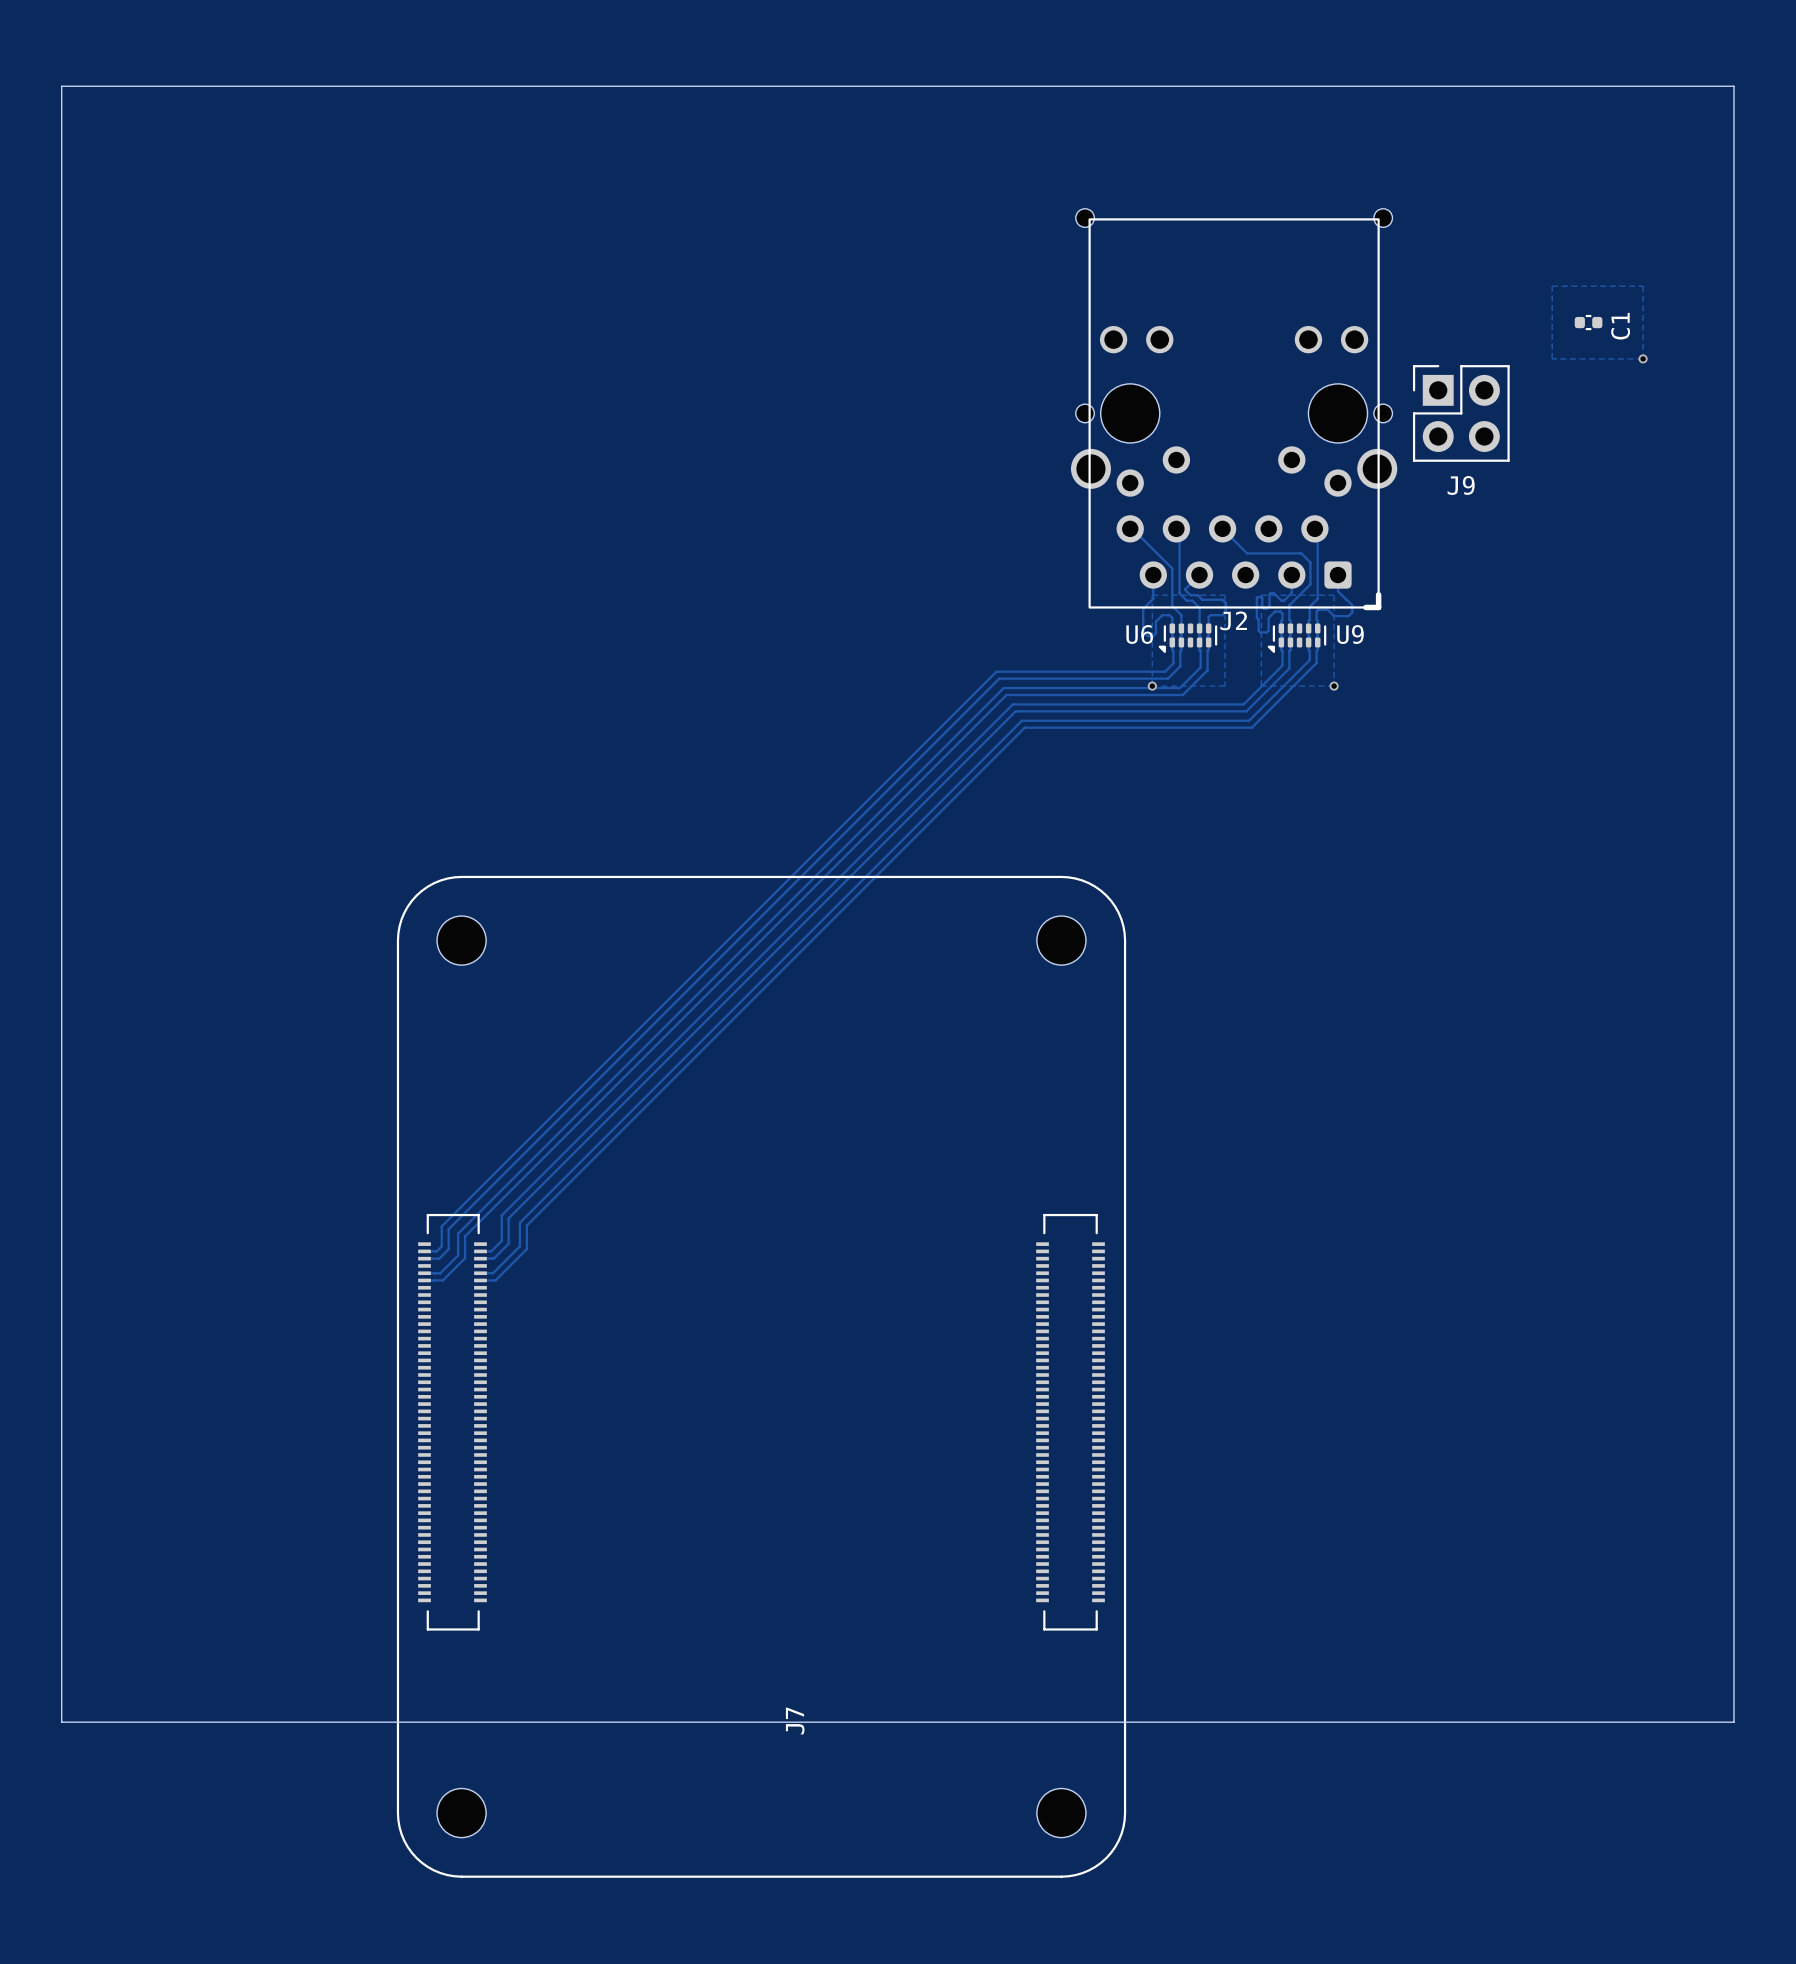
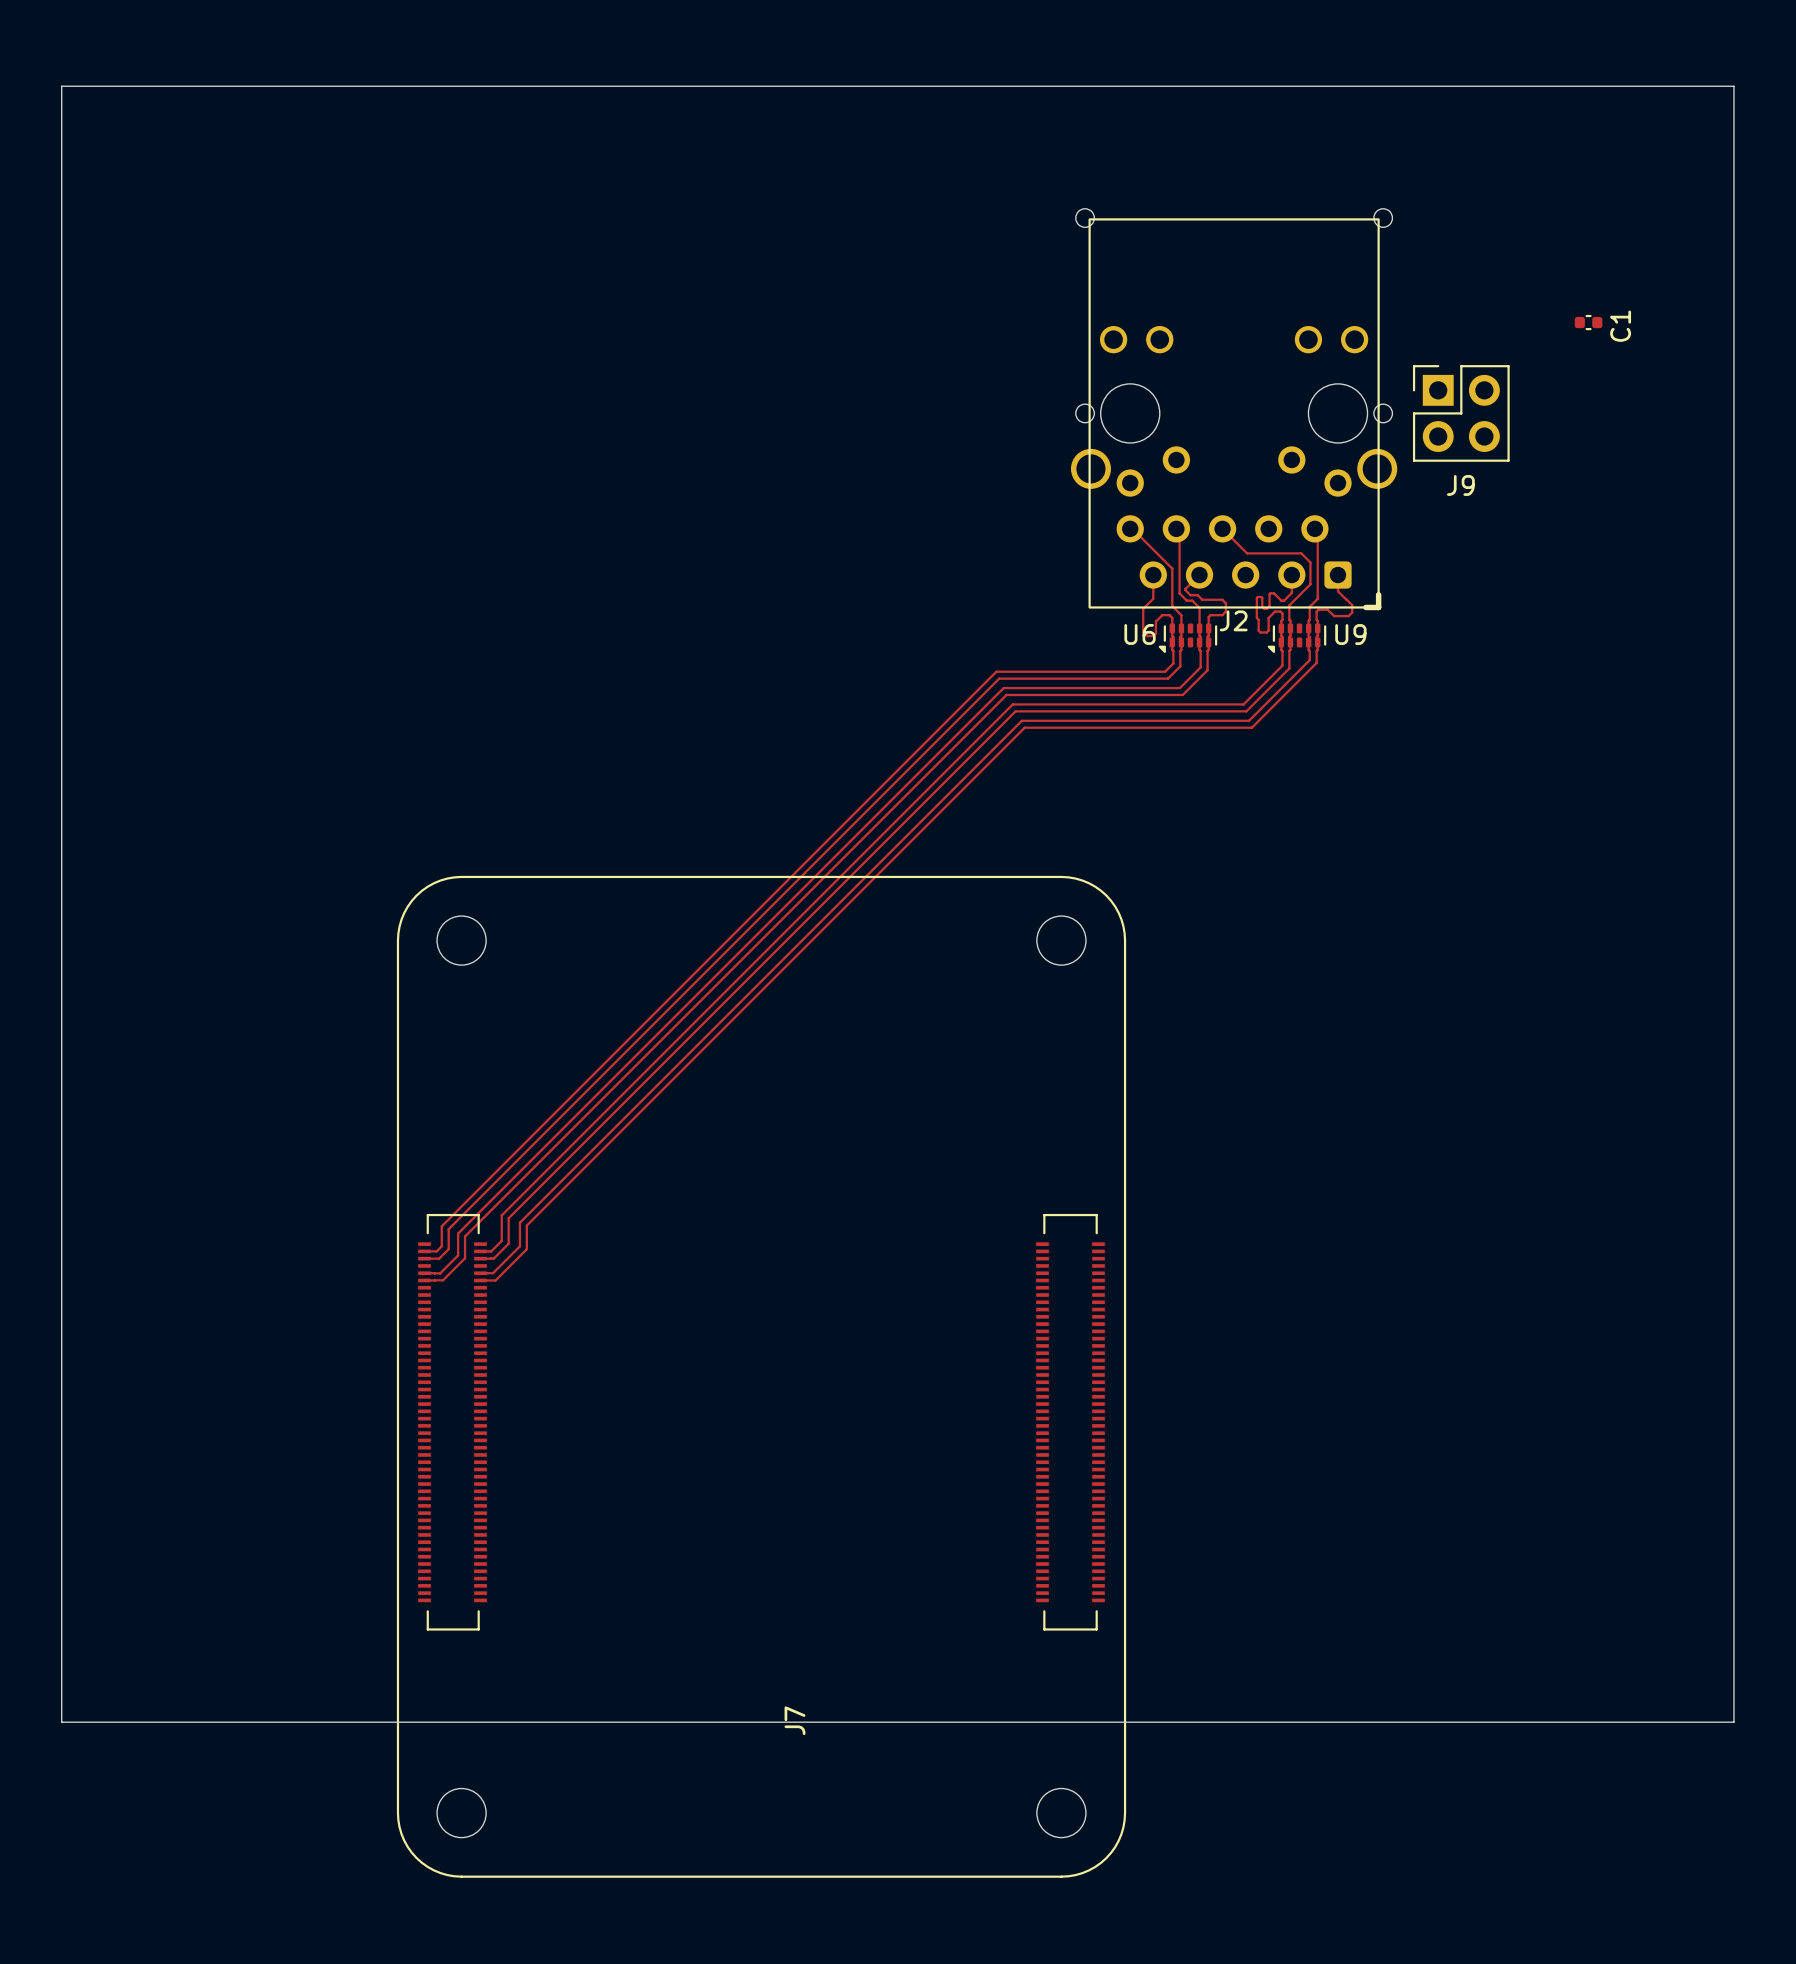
zone outline: (1552, 286) (1643, 286) (1643, 358) (1552, 358) (1552, 286) -> none
via: (1643, 358) -> none
zone outline: (1152, 595) (1225, 595) (1225, 686) (1152, 686) (1152, 595) -> none
zone outline: (1261, 595) (1334, 595) (1334, 686) (1261, 686) (1261, 595) -> none
via: (1152, 686) -> none
via: (1334, 686) -> none

